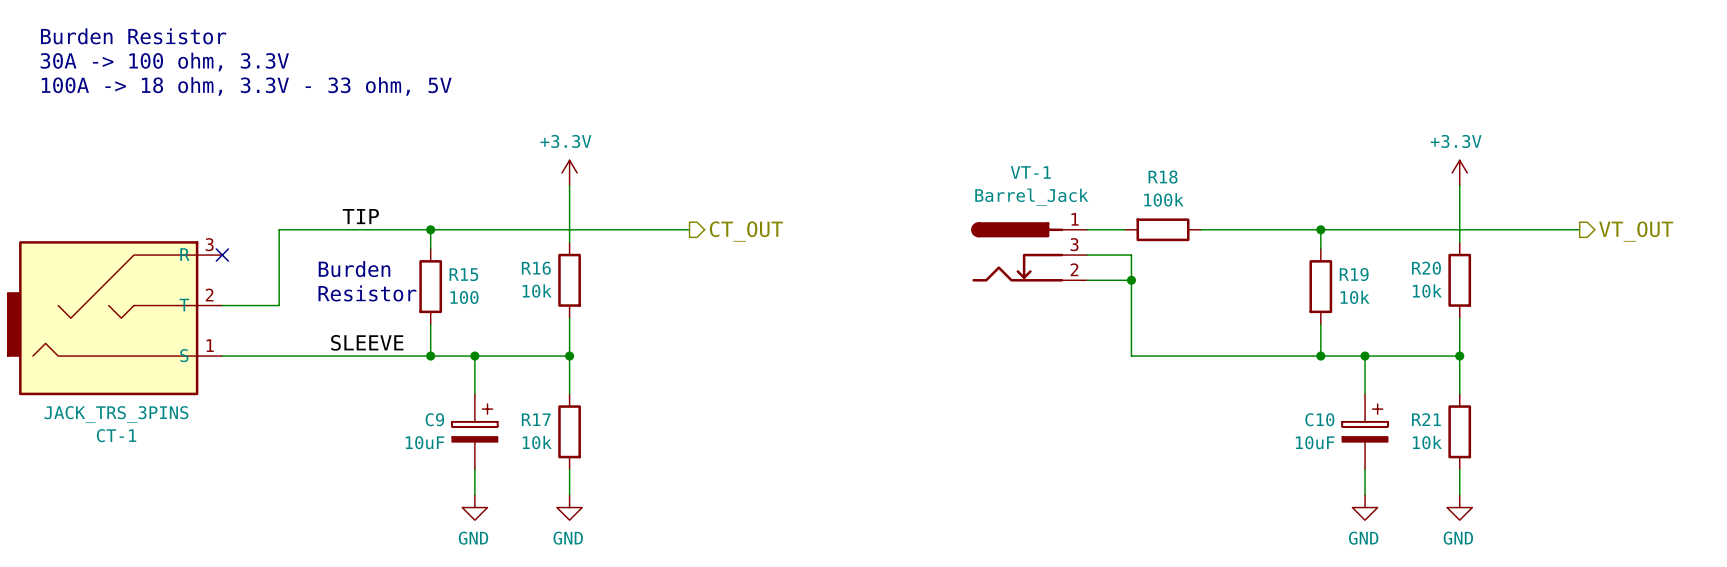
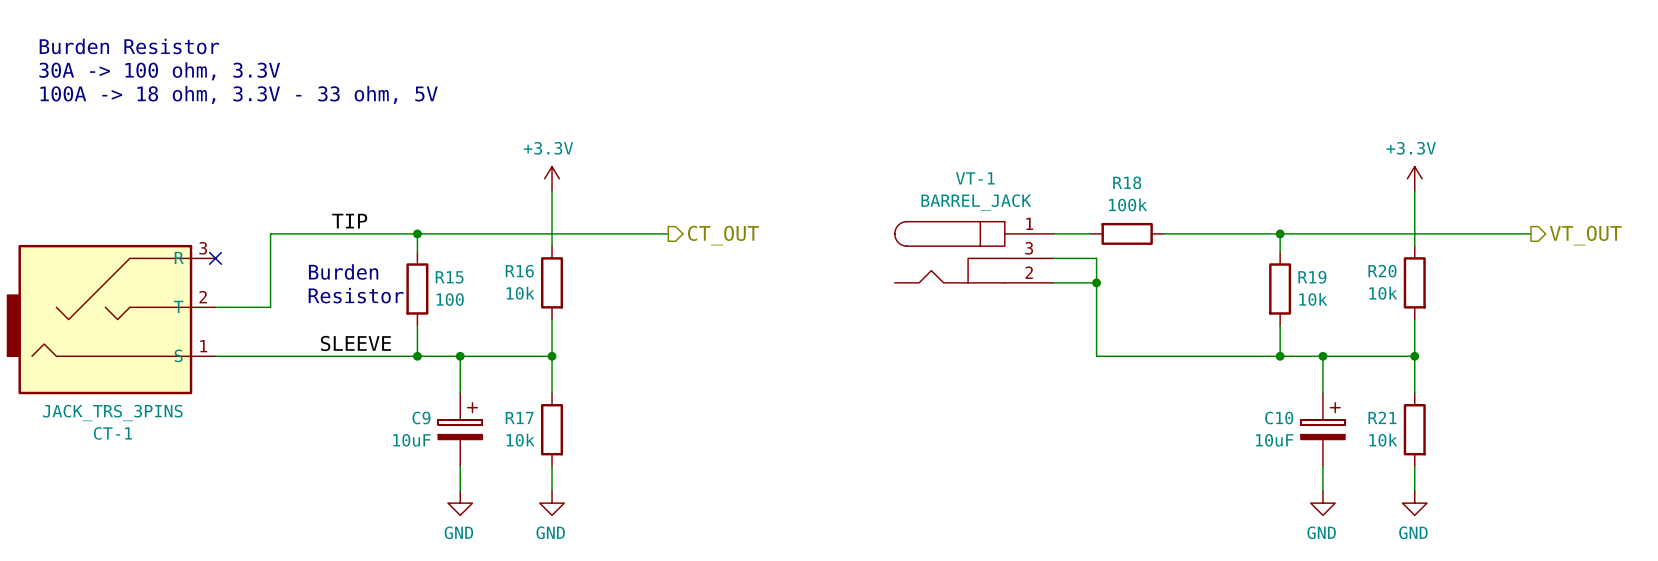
VT-1 value: Barrel_Jack (1031, 197) -> BARREL_JACK (976, 202)
VT-1 symbol: [971, 222, 1088, 282] -> [894, 221, 1054, 283]

